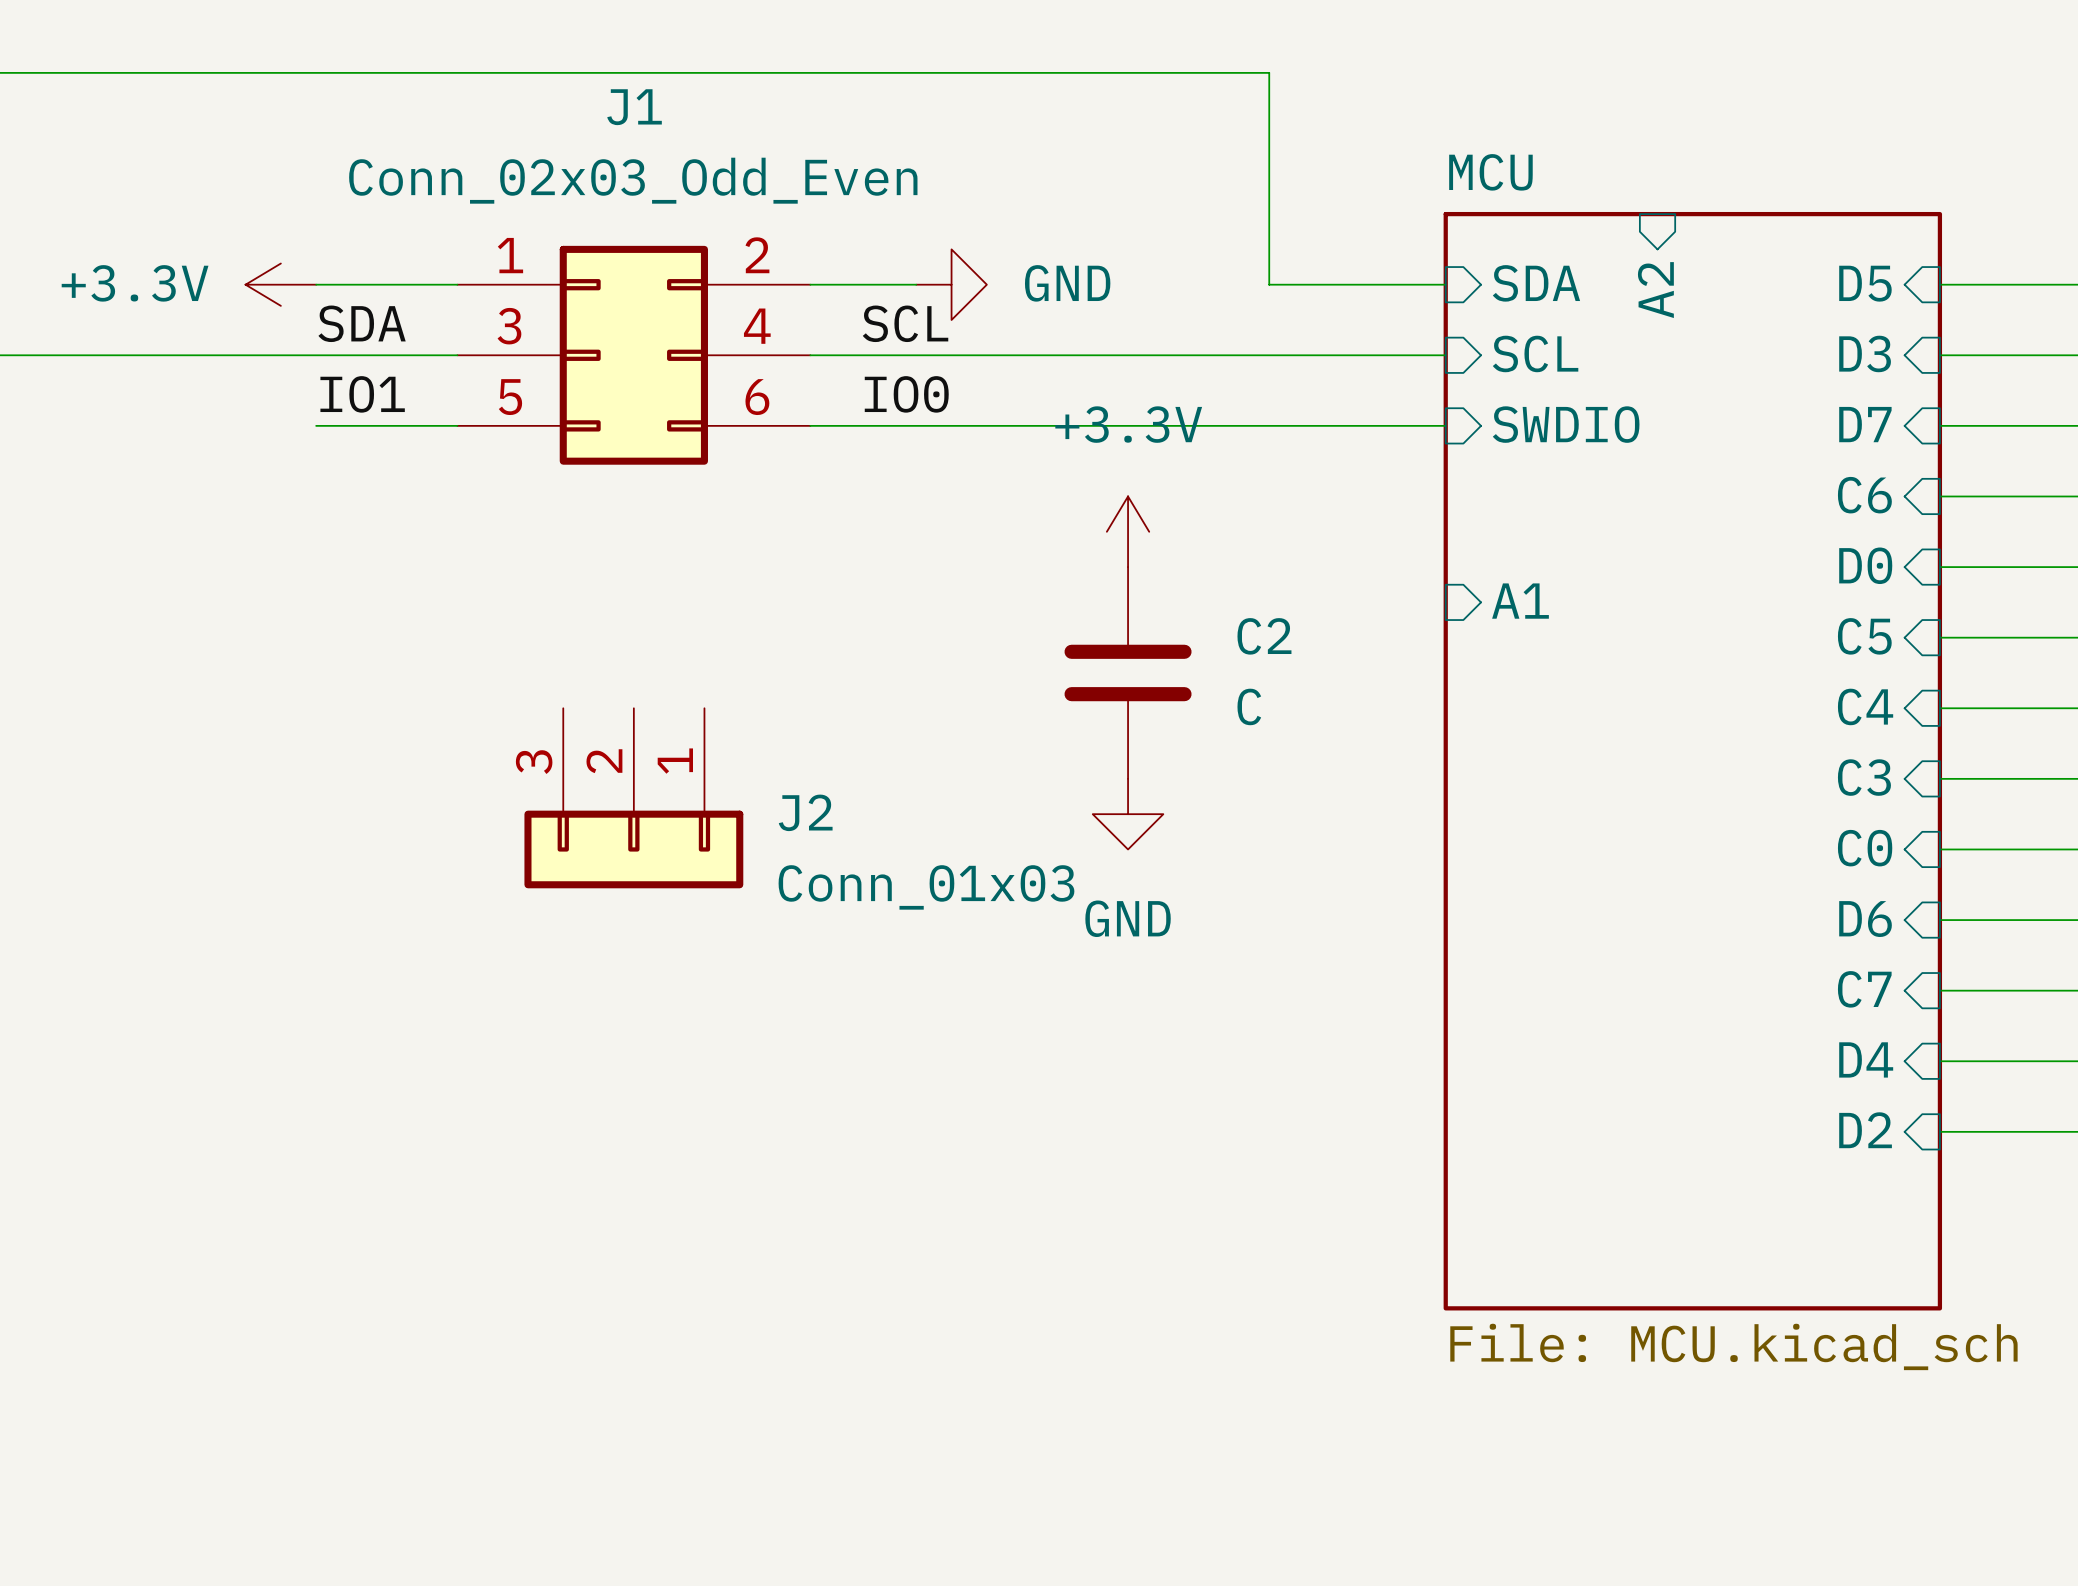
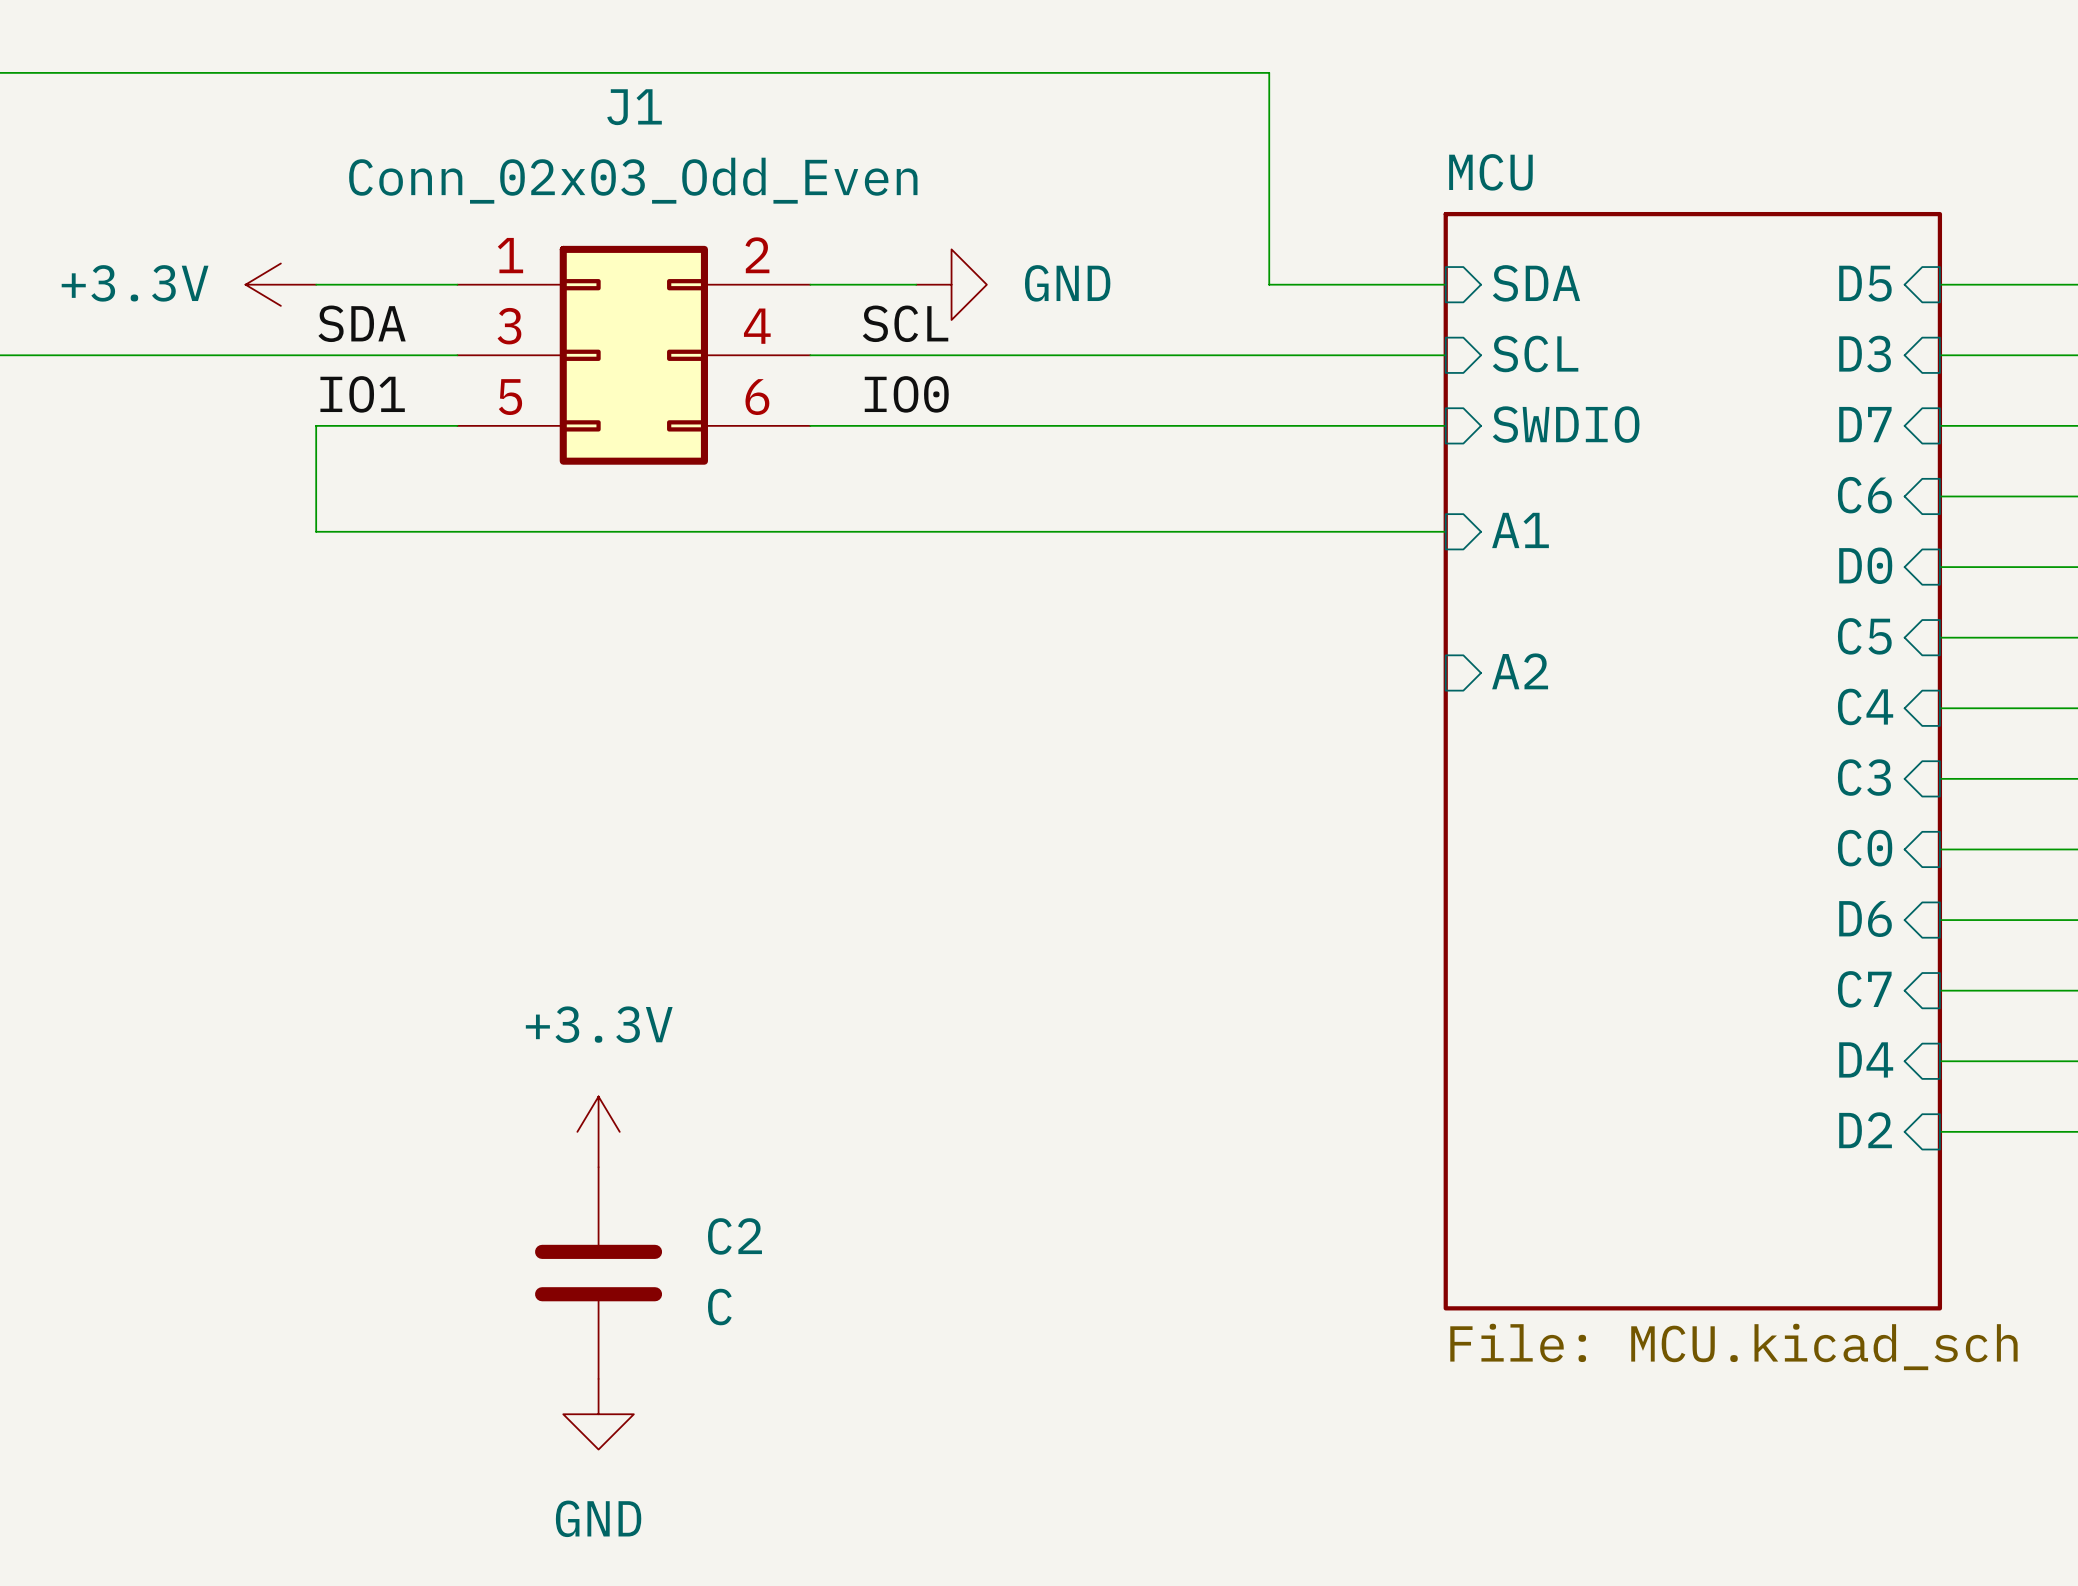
sheet pin rotation: 0° (1655, 290) -> 90° counterclockwise (1520, 671)
sheet pin position: A2 (1655, 290) -> A2 (1520, 671)
wire: none -> (316, 425) (316, 531) (1445, 531)
power symbol: +3.3V (1128, 531) -> none
sheet pin position: A1 (1520, 601) -> A1 (1520, 530)
C2 position: (1128, 672) -> (598, 1273)
J2: Conn_01x03 (633, 798) -> none
power symbol: GND (1128, 814) -> none
power symbol: none -> +3.3V (598, 1131)
power symbol: none -> GND (598, 1414)

